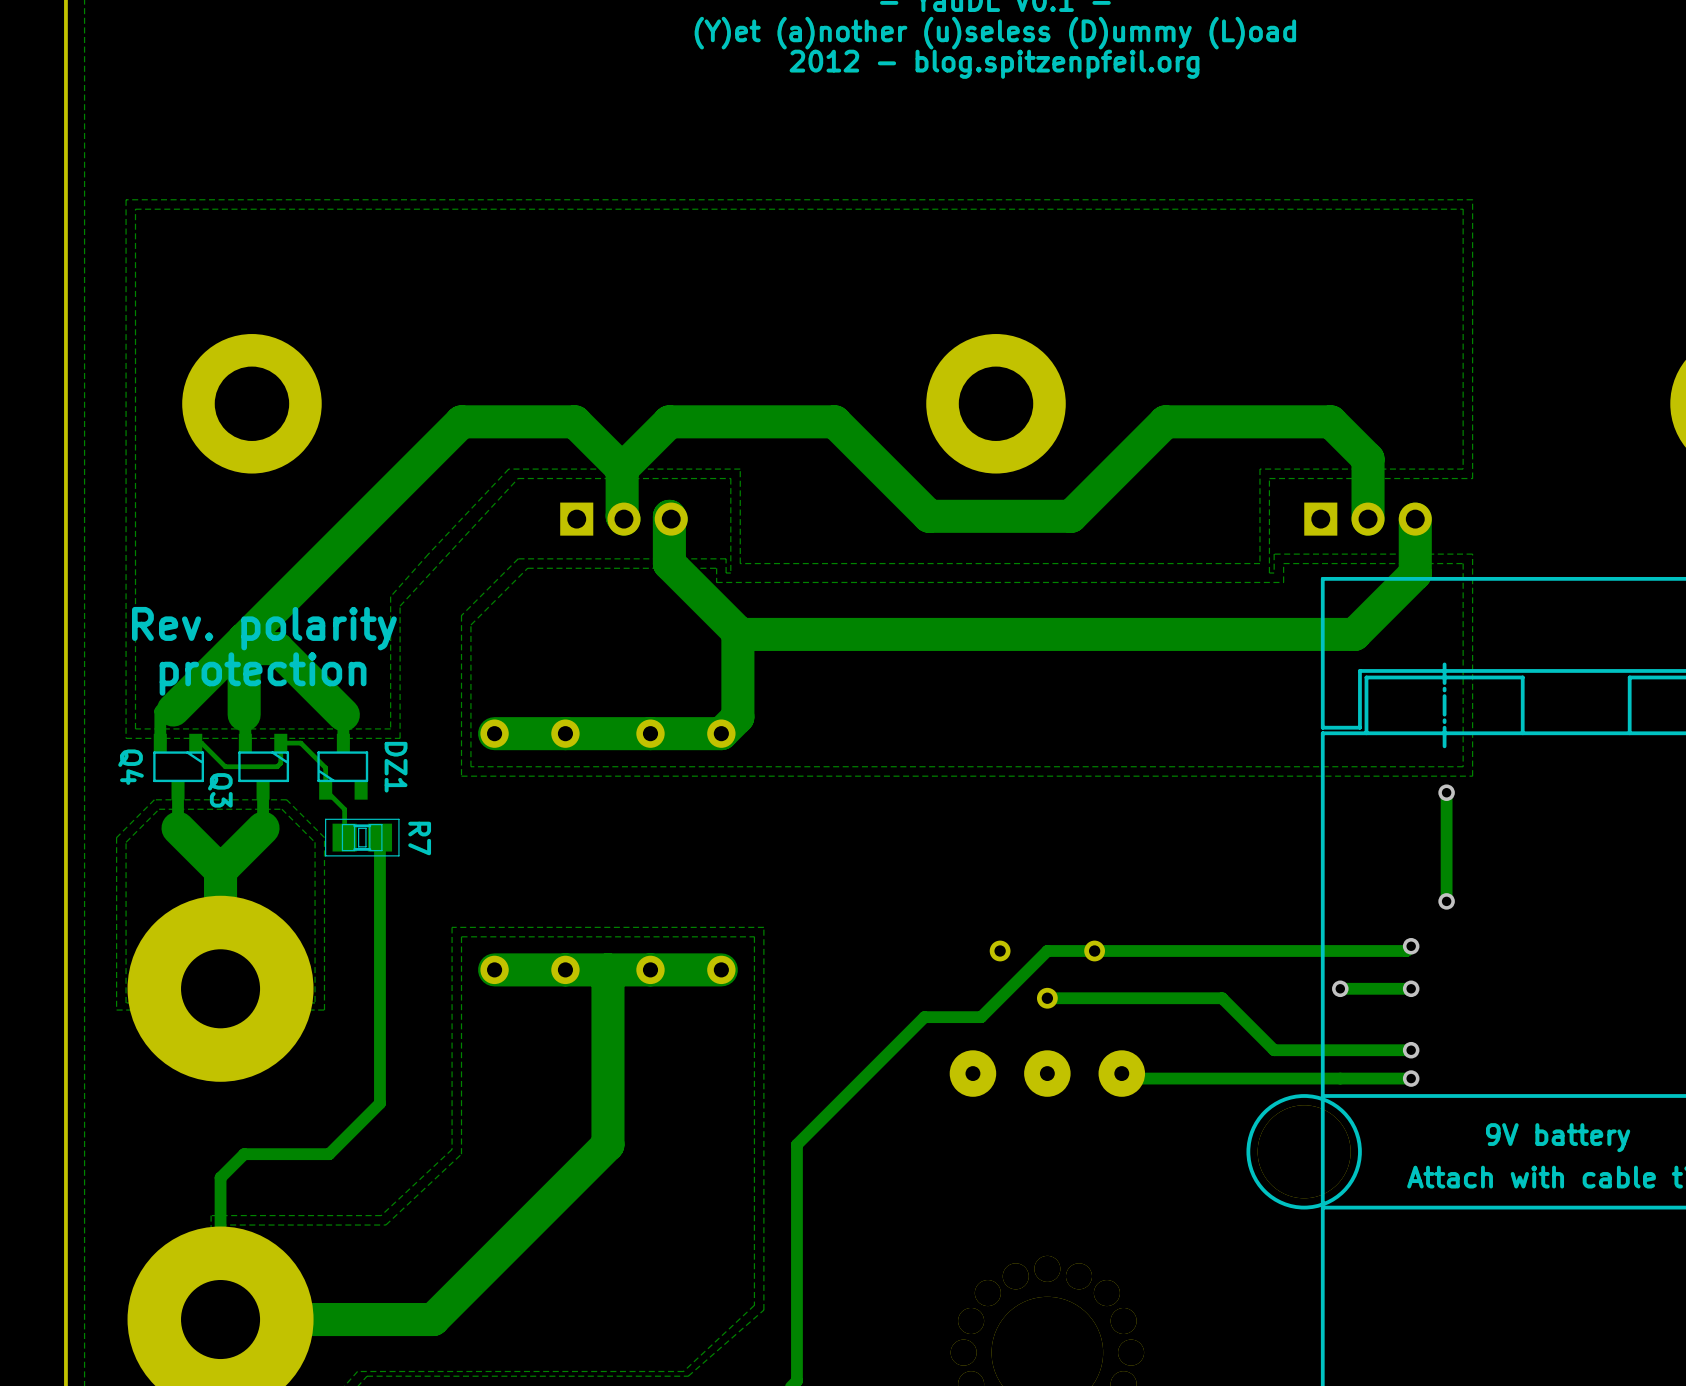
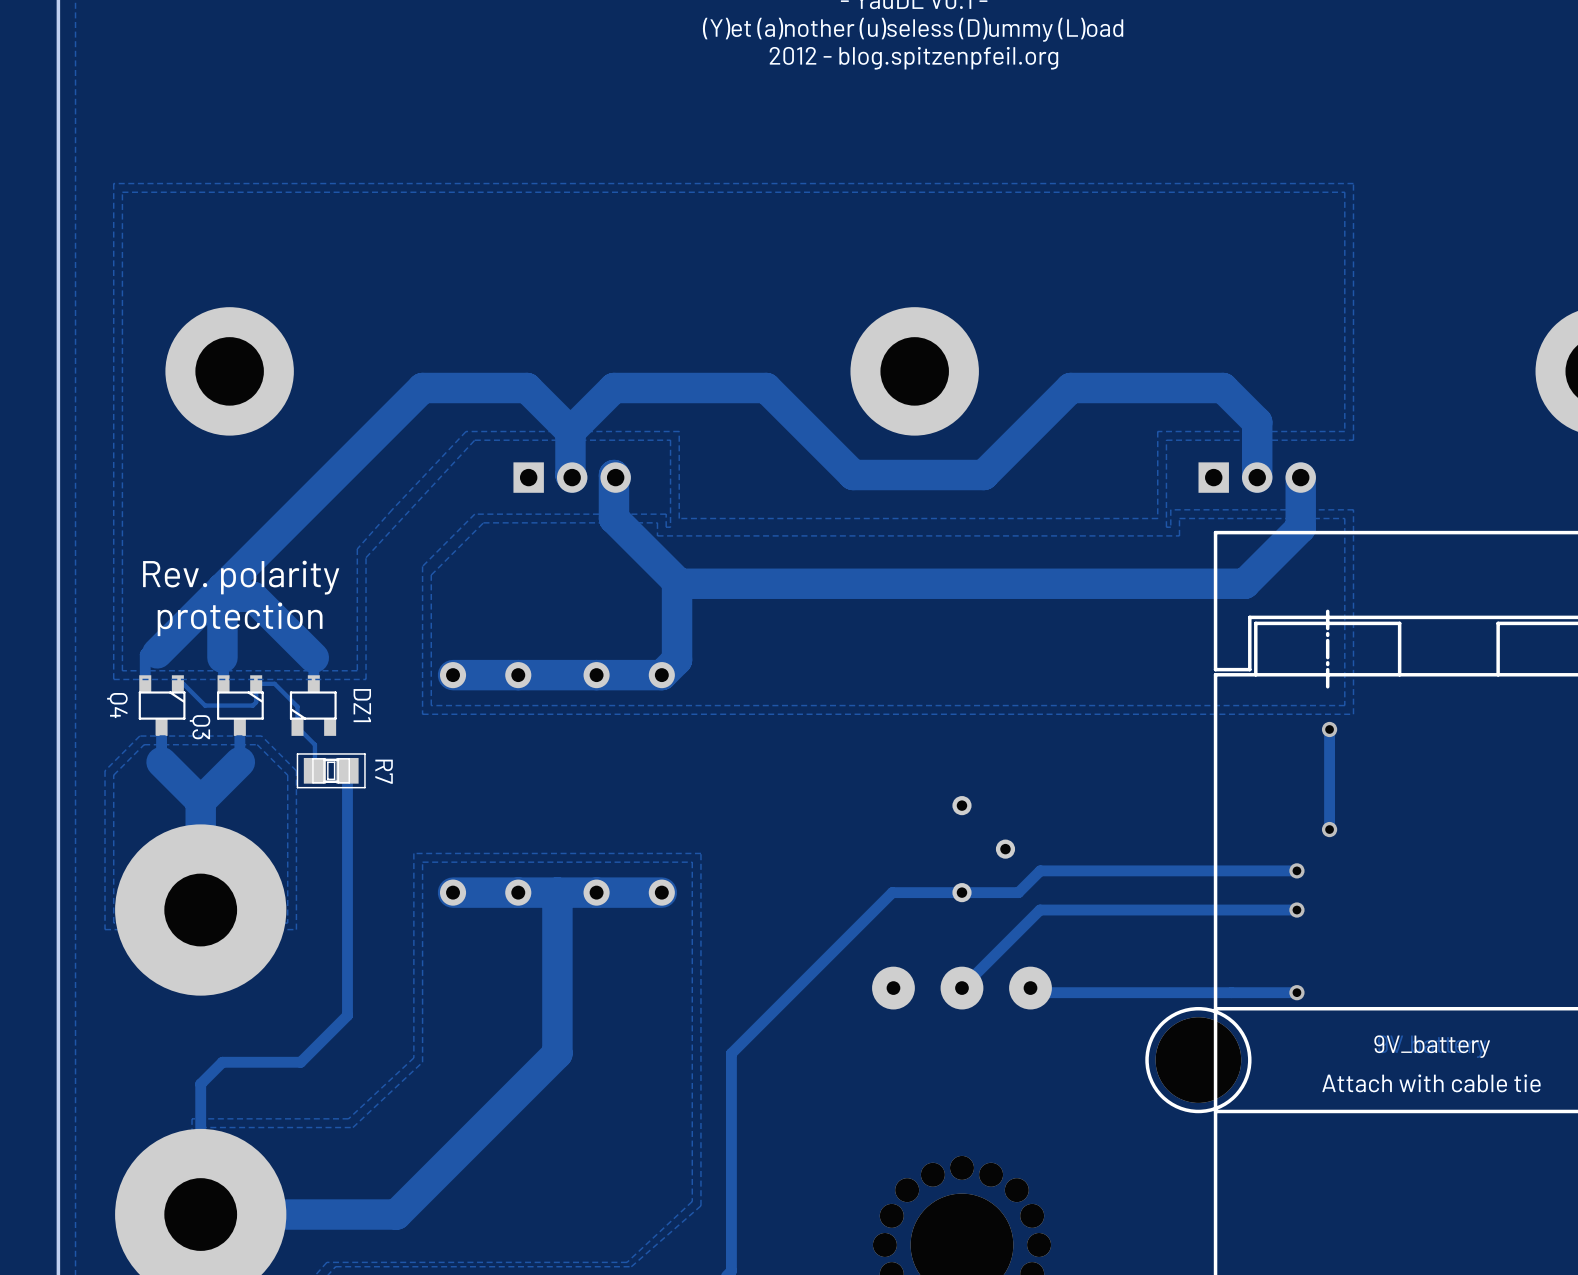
track: (1411, 946) (1406, 950) (1047, 950) (981, 1017) (924, 1017) -> (1296, 870) (1040, 870) (1018, 892) (892, 892) (848, 936)
part rotation: 0° (1047, 974) -> 90° counterclockwise (983, 849)
track: none -> (1231, 910) (1040, 910) (961, 988)
via: (1340, 988) -> none
track: (1047, 998) (1222, 998) (1274, 1050) (1411, 1050) -> none
via: (1411, 1050) -> none
part value: 9V battery (1558, 1137) -> 9V_battery (1432, 1046)

